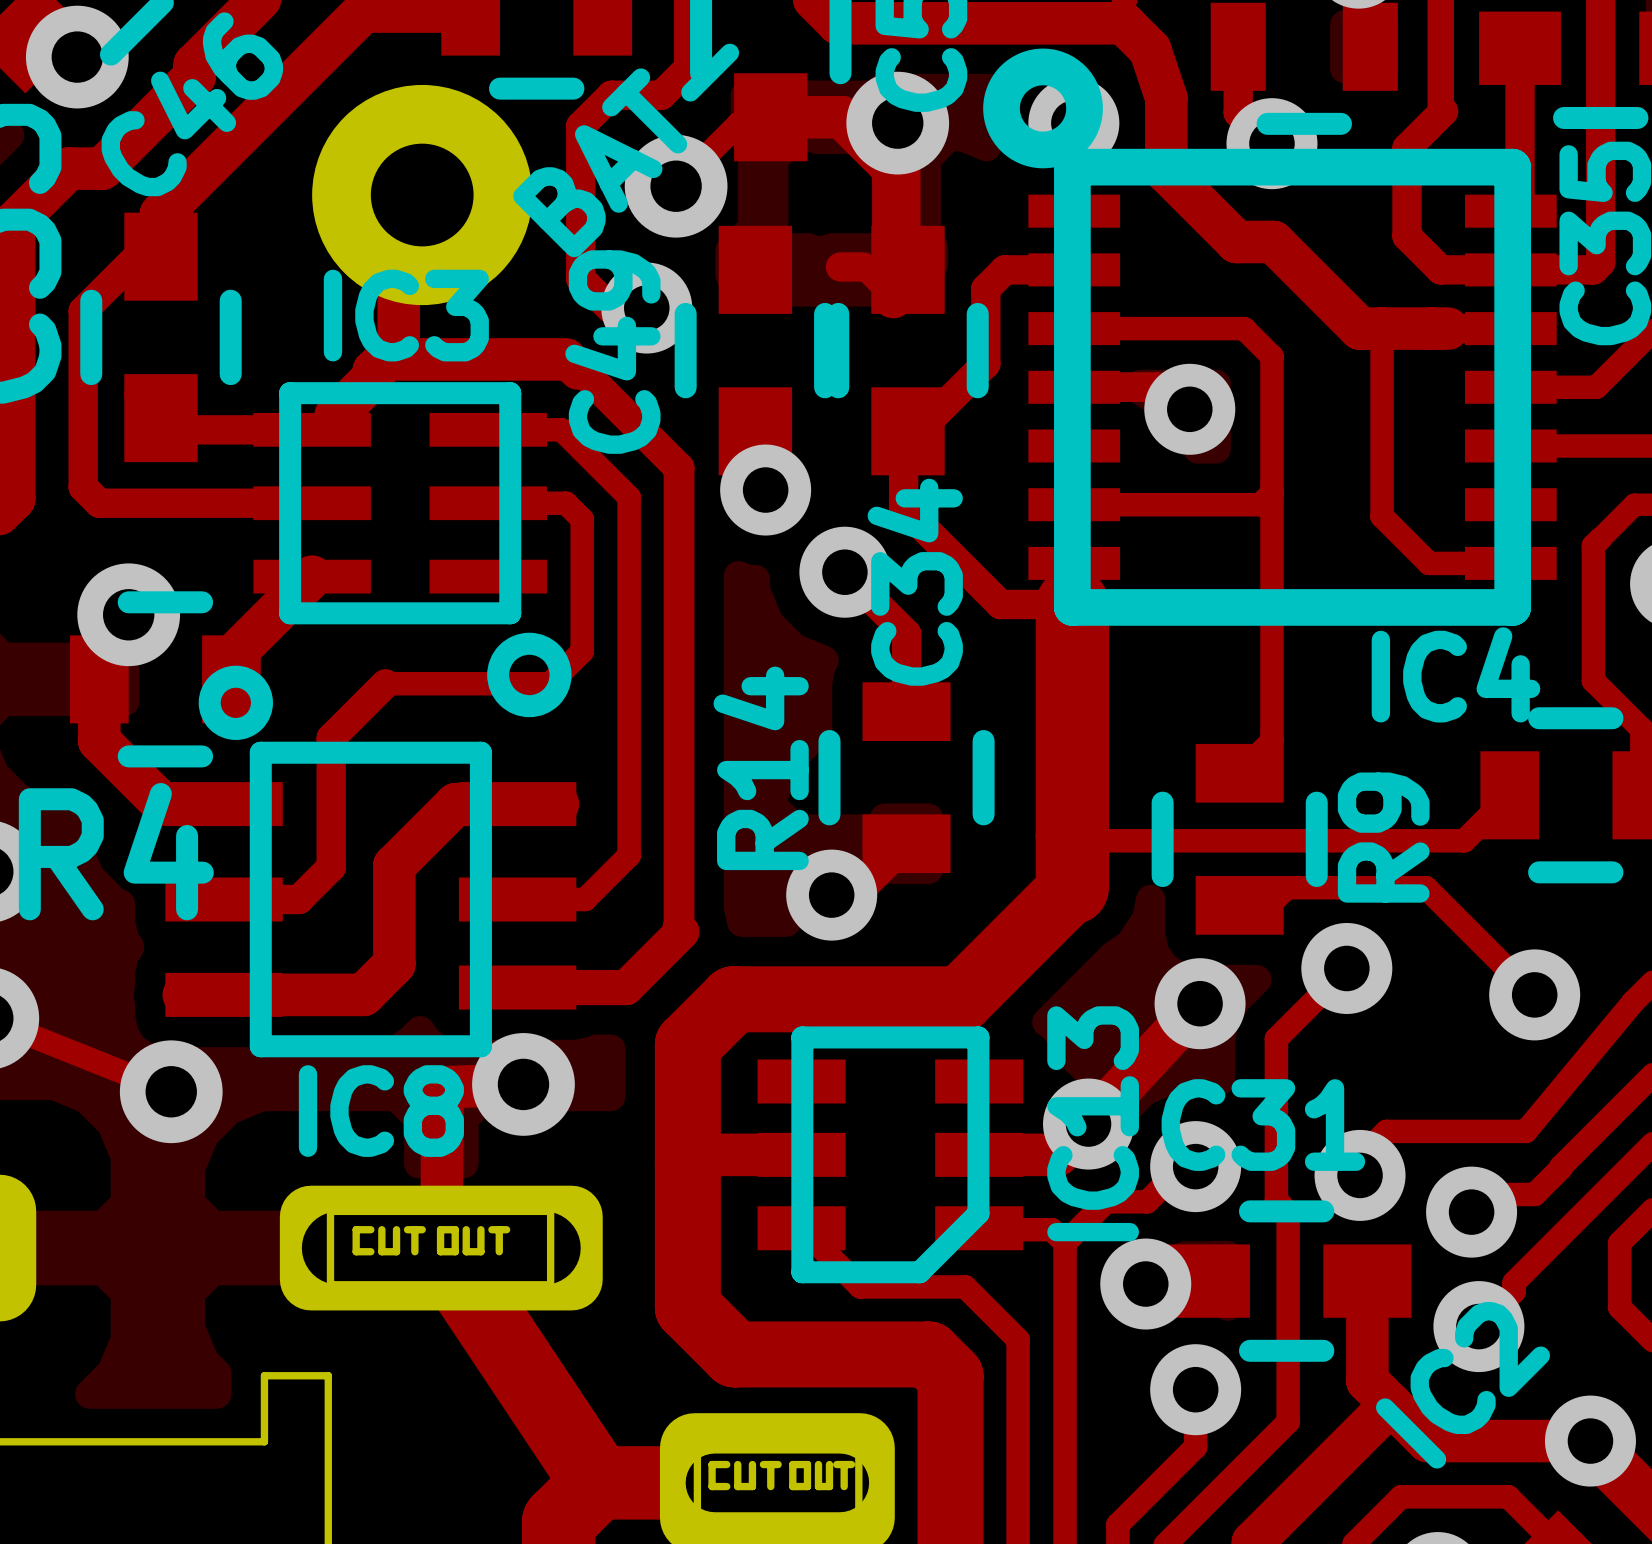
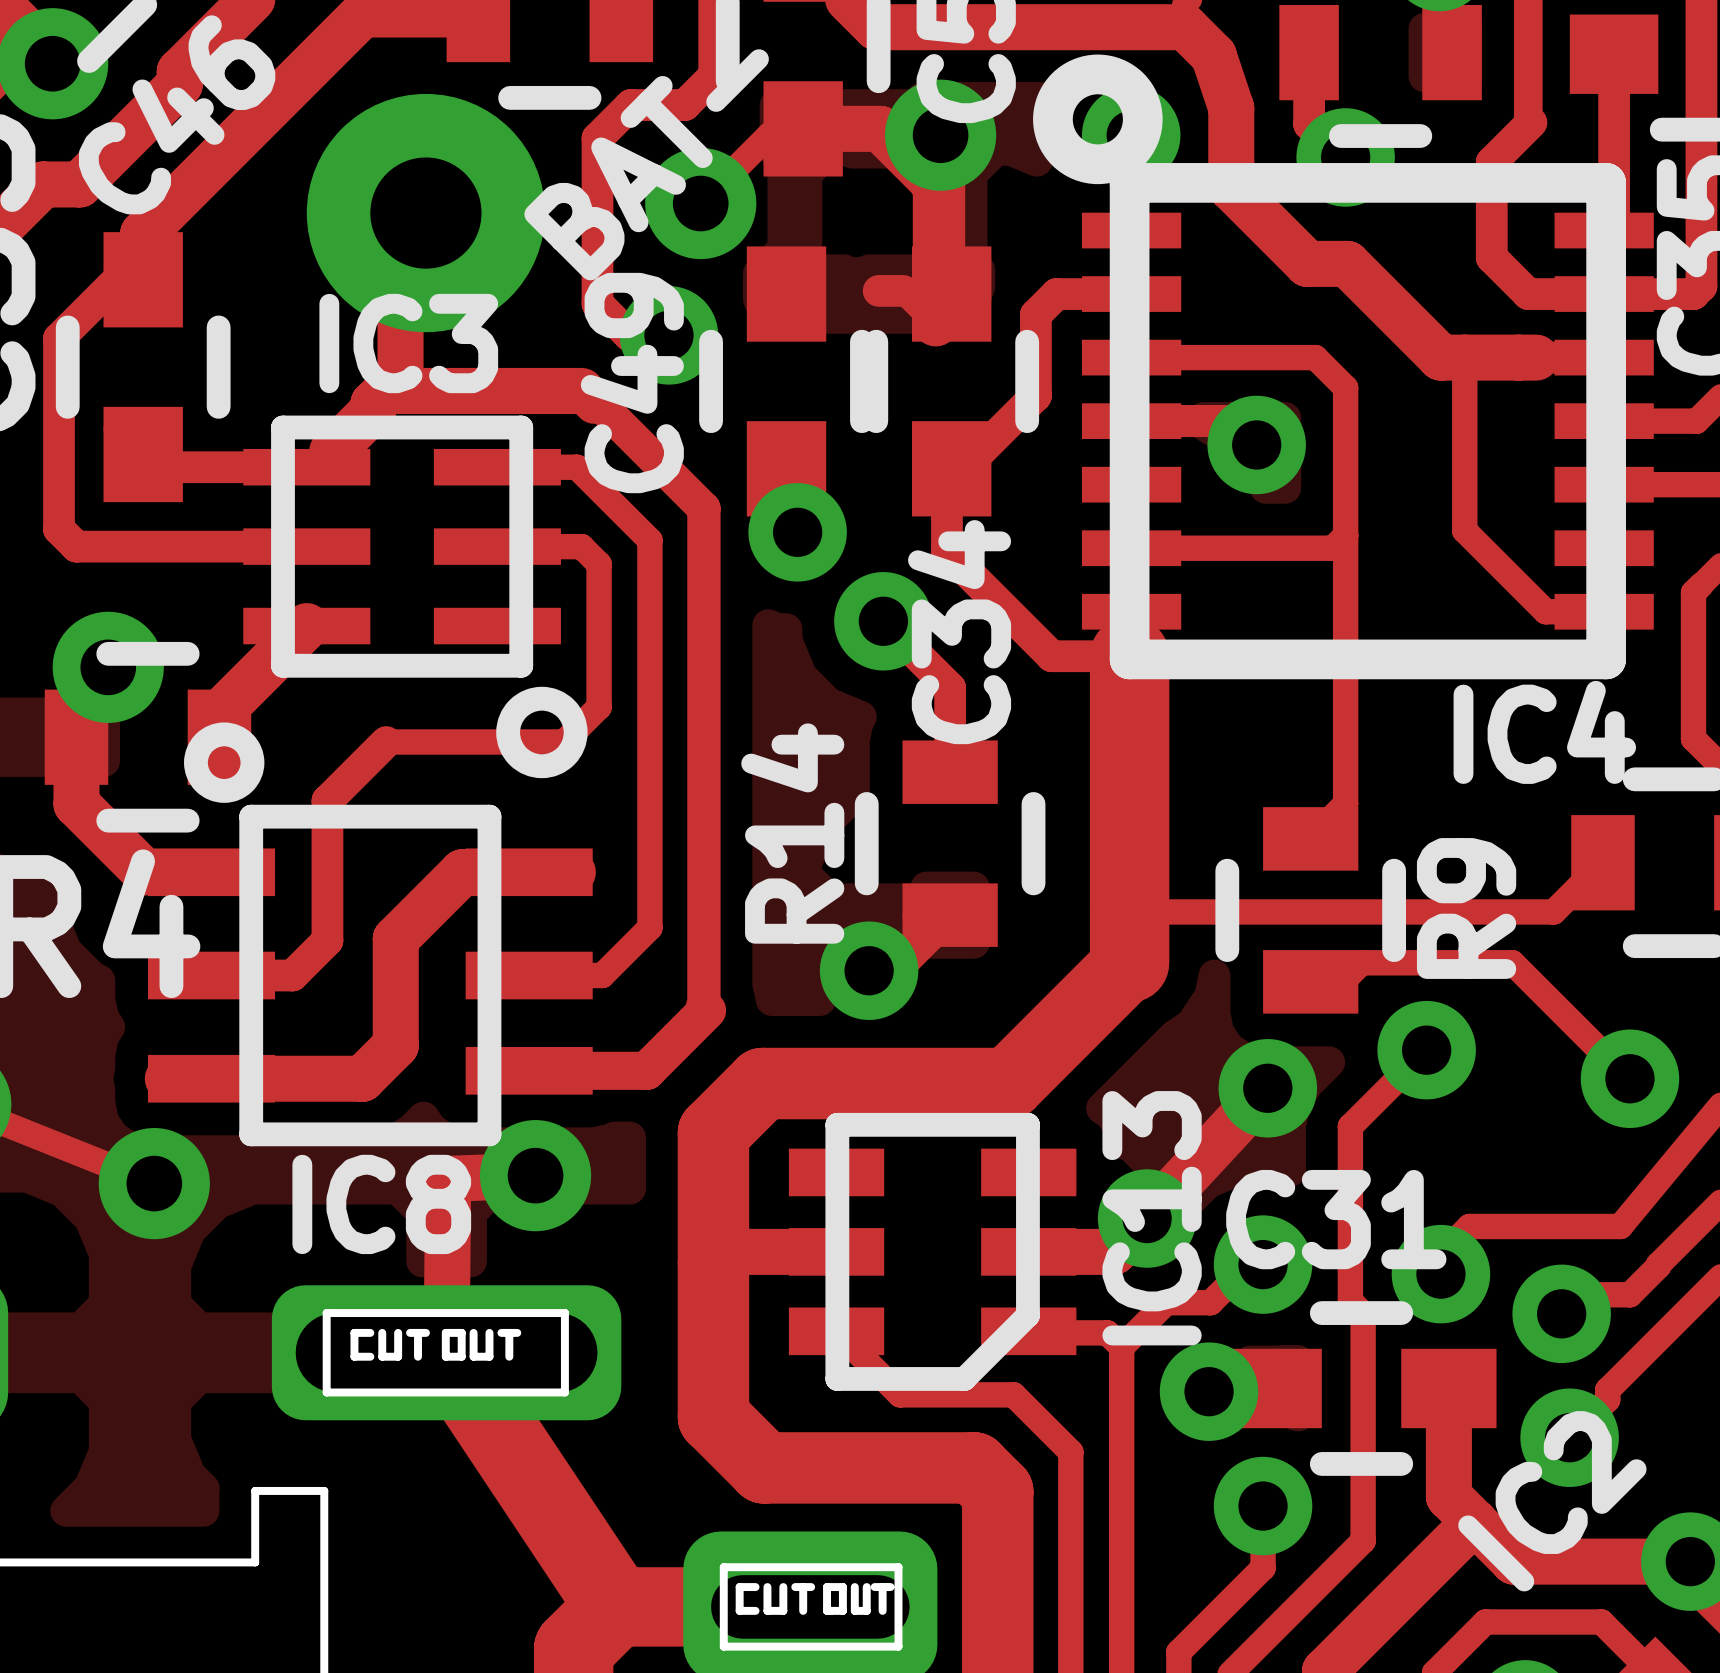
track: (1382, 488) (1382, 516) (1429, 563) (1456, 563) -> (1464, 530) (1545, 611)

